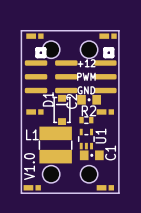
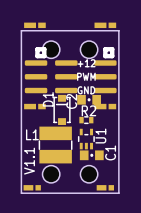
part: none -> (34, 25)
part: none -> (105, 25)
part: (34, 36) -> none
part: (108, 36) -> none
part footprint: [26, 109, 44, 115] -> [24, 103, 46, 110]
part footprint: [96, 109, 115, 115] -> [94, 103, 117, 110]
text: V1.0 (29, 166) -> V1.1 (29, 161)

